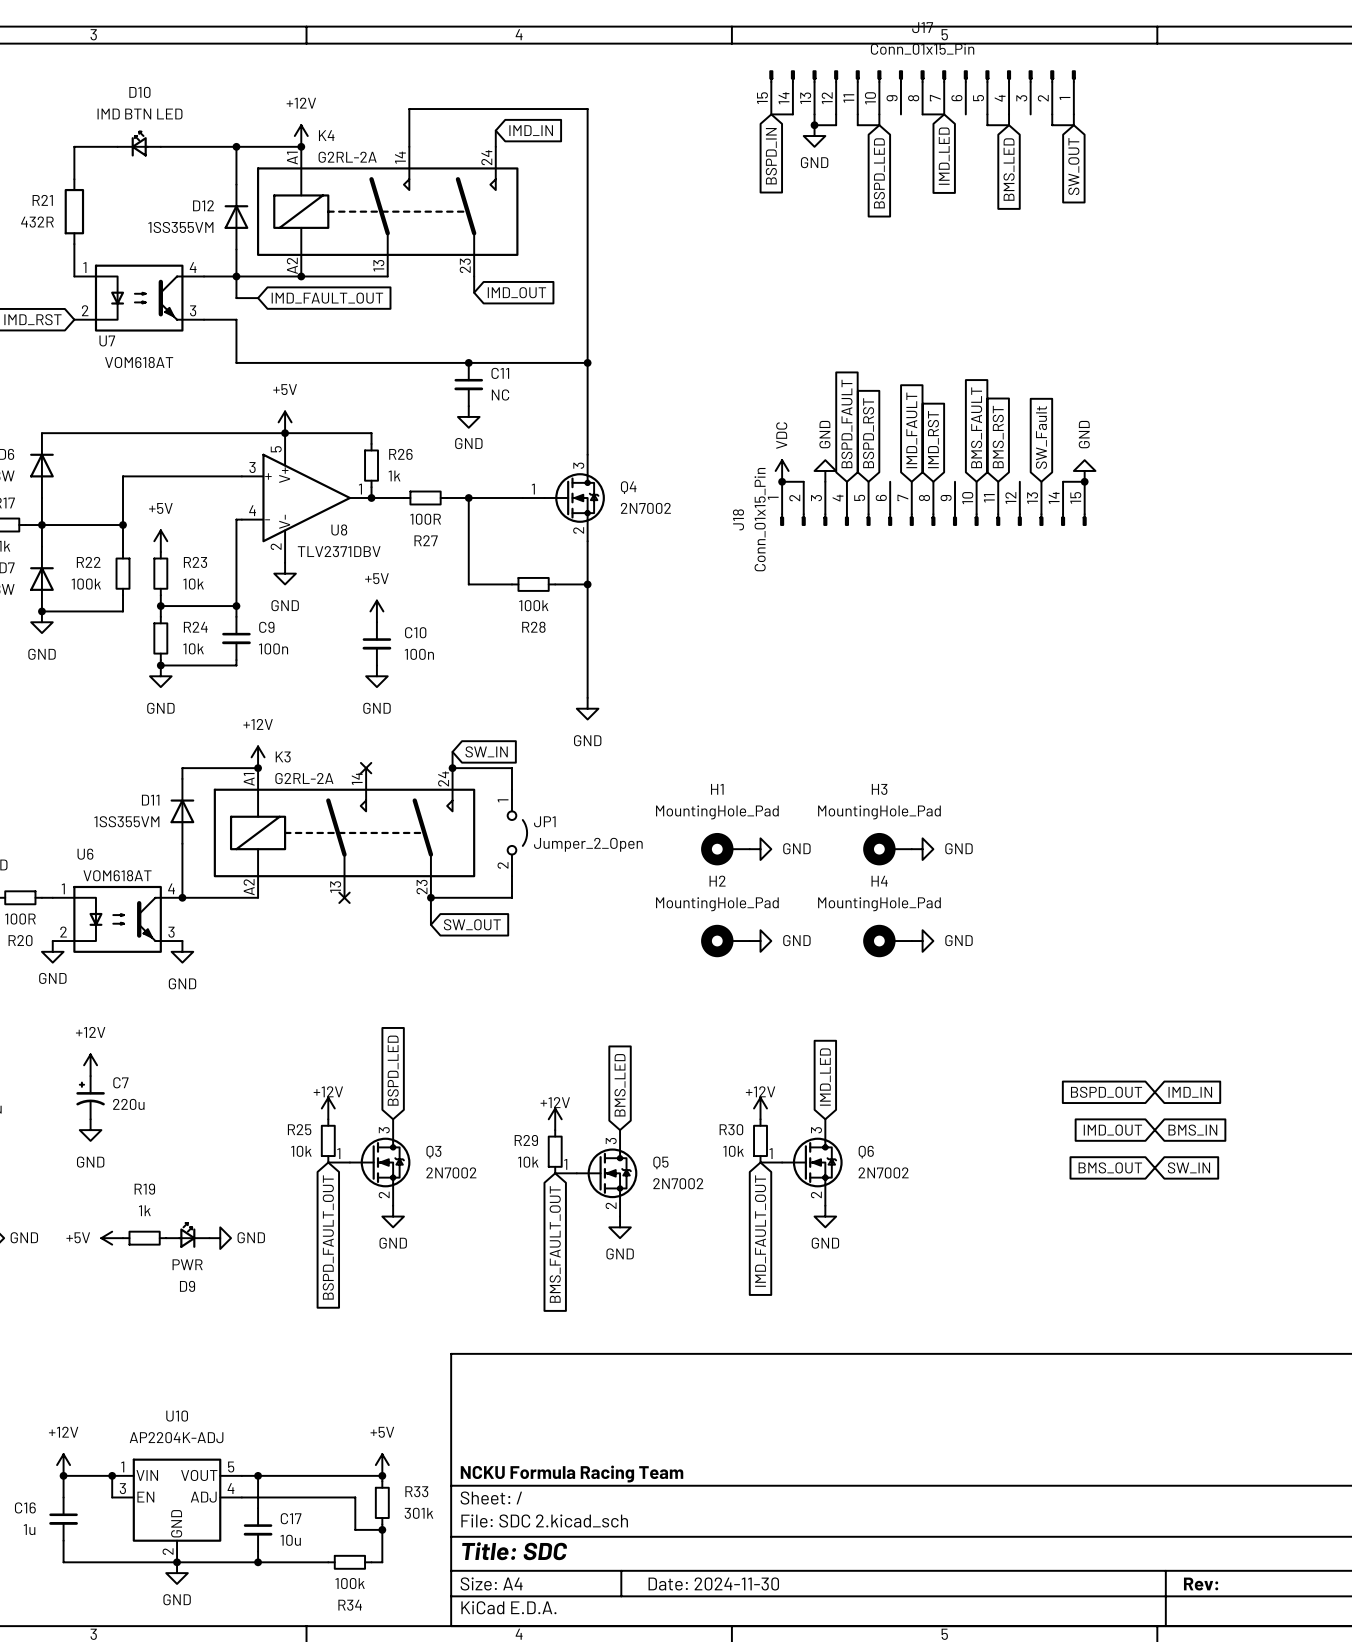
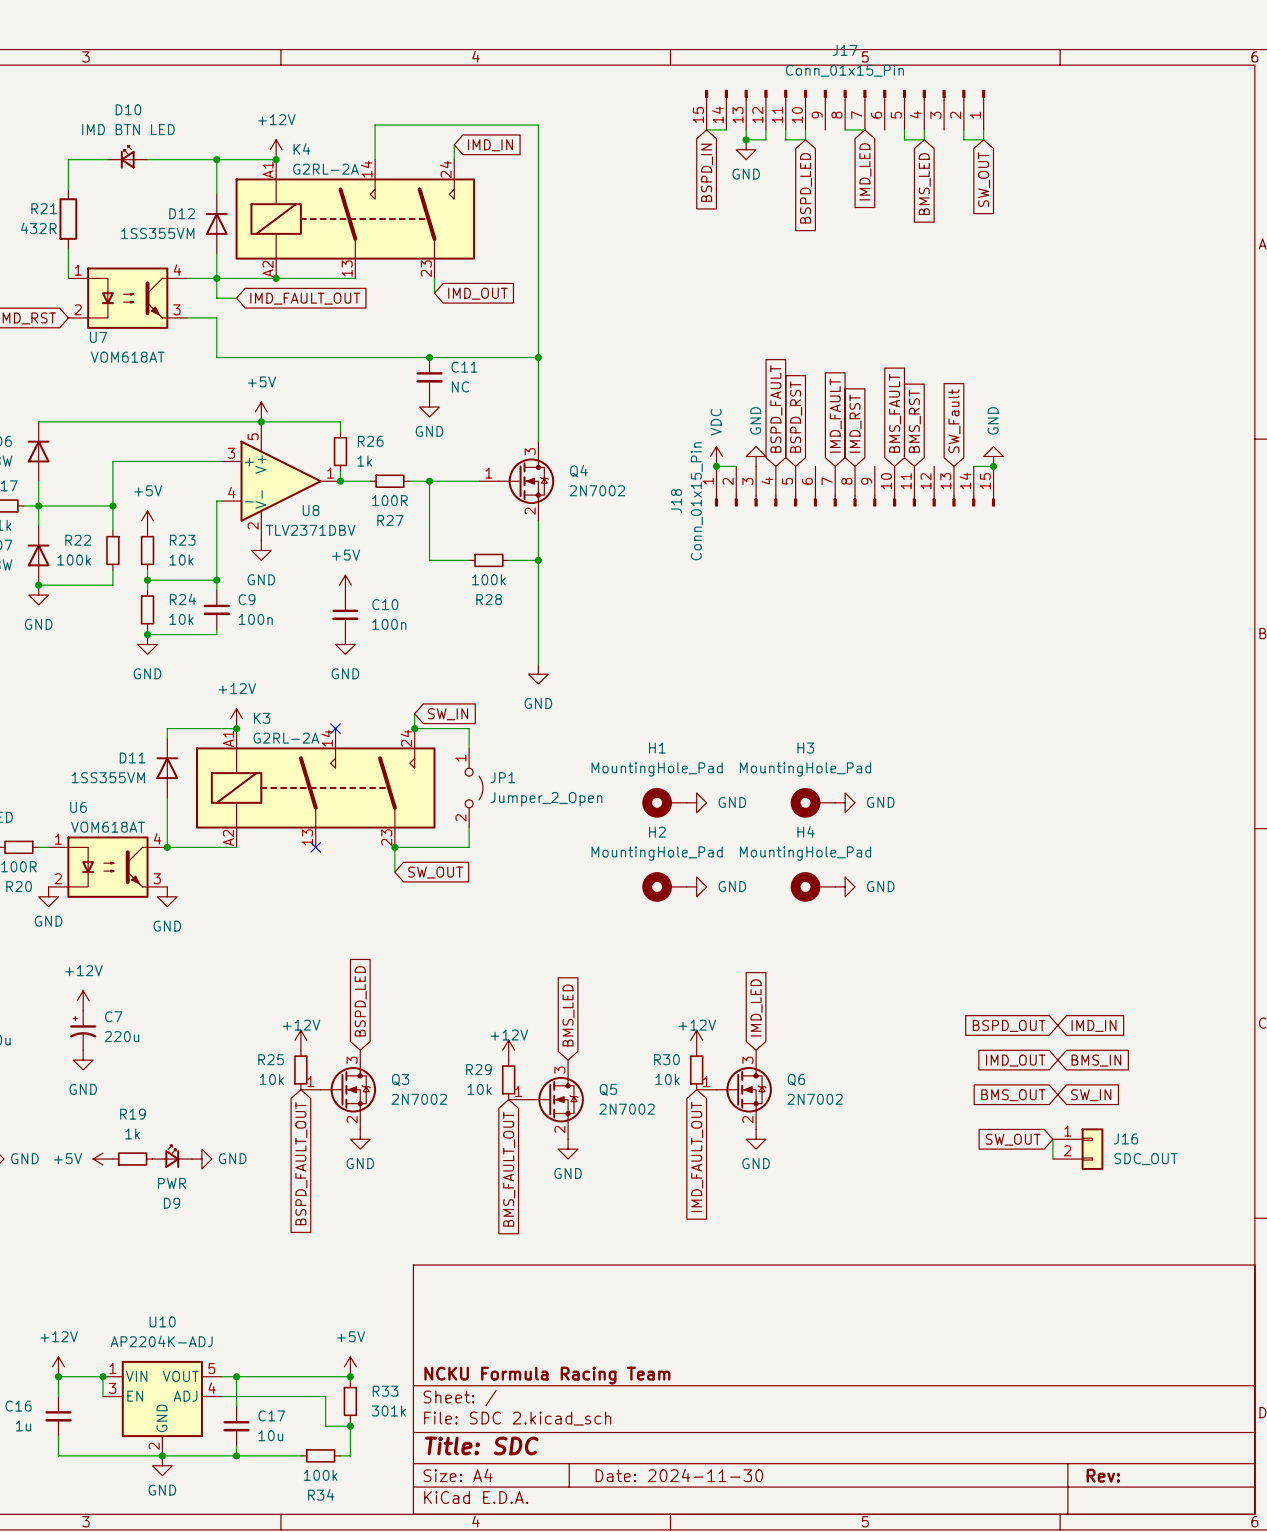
global label: none -> SW_OUT (1013, 1139)
wire: none -> (1052, 1139) (1052, 1159)
J16: none -> SDC_OUT (1078, 1149)

